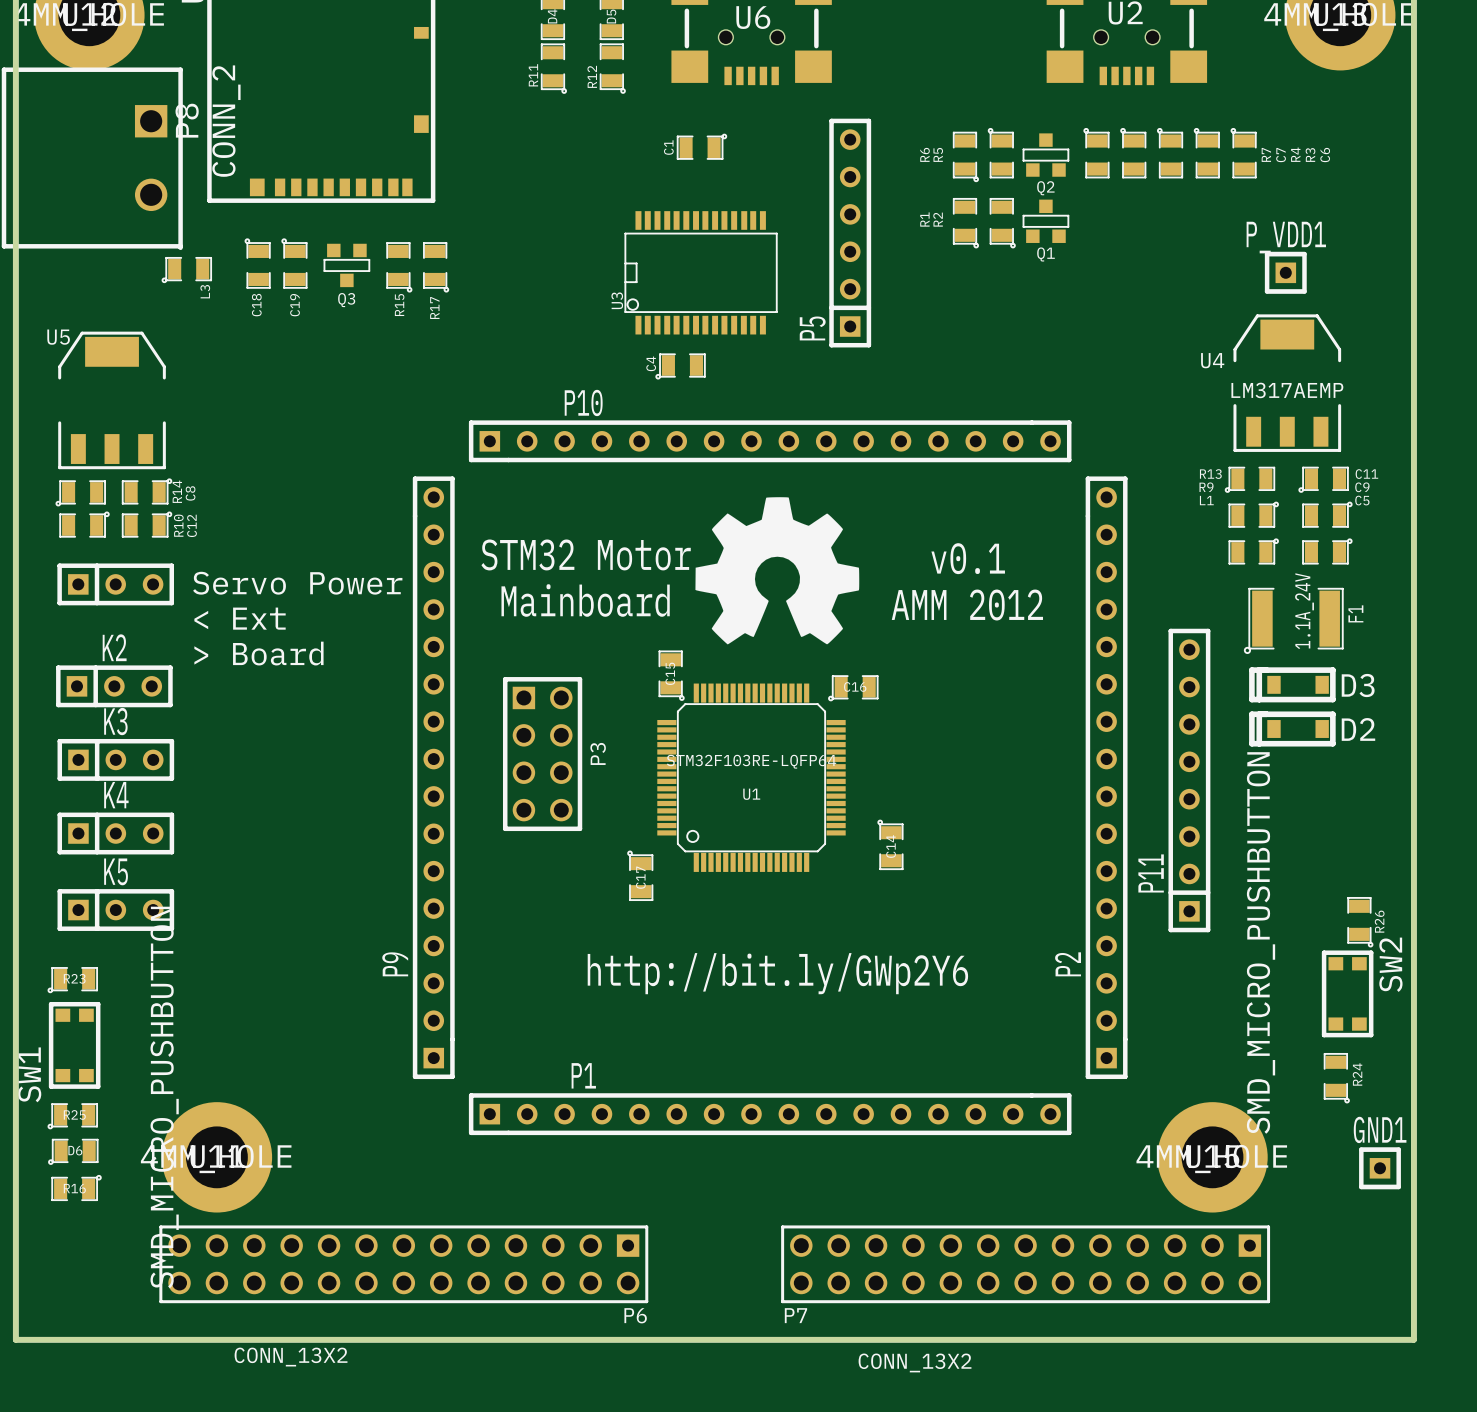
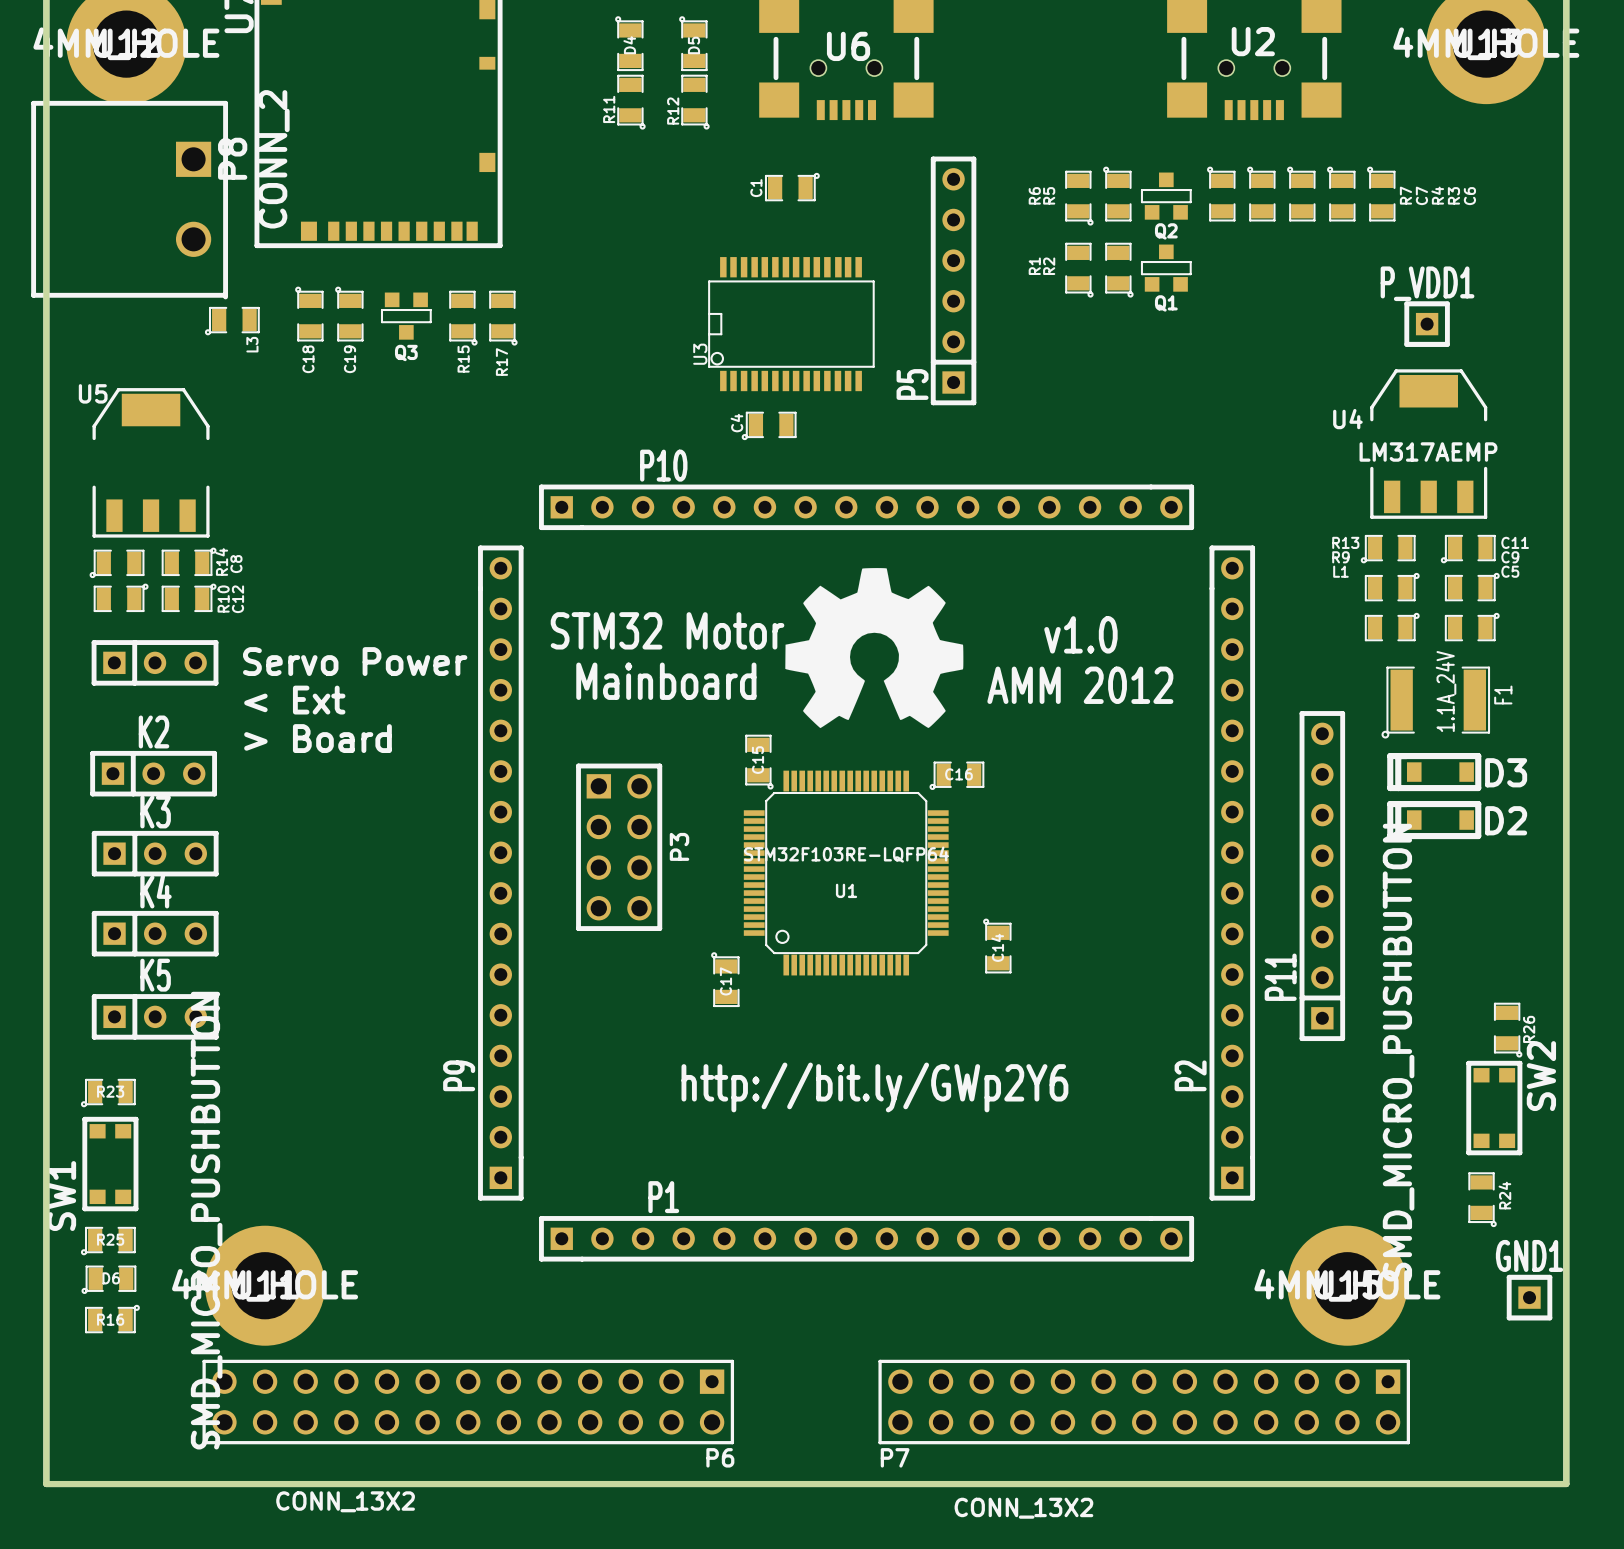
text: v0.1 (968, 558) -> v1.0 (1080, 634)

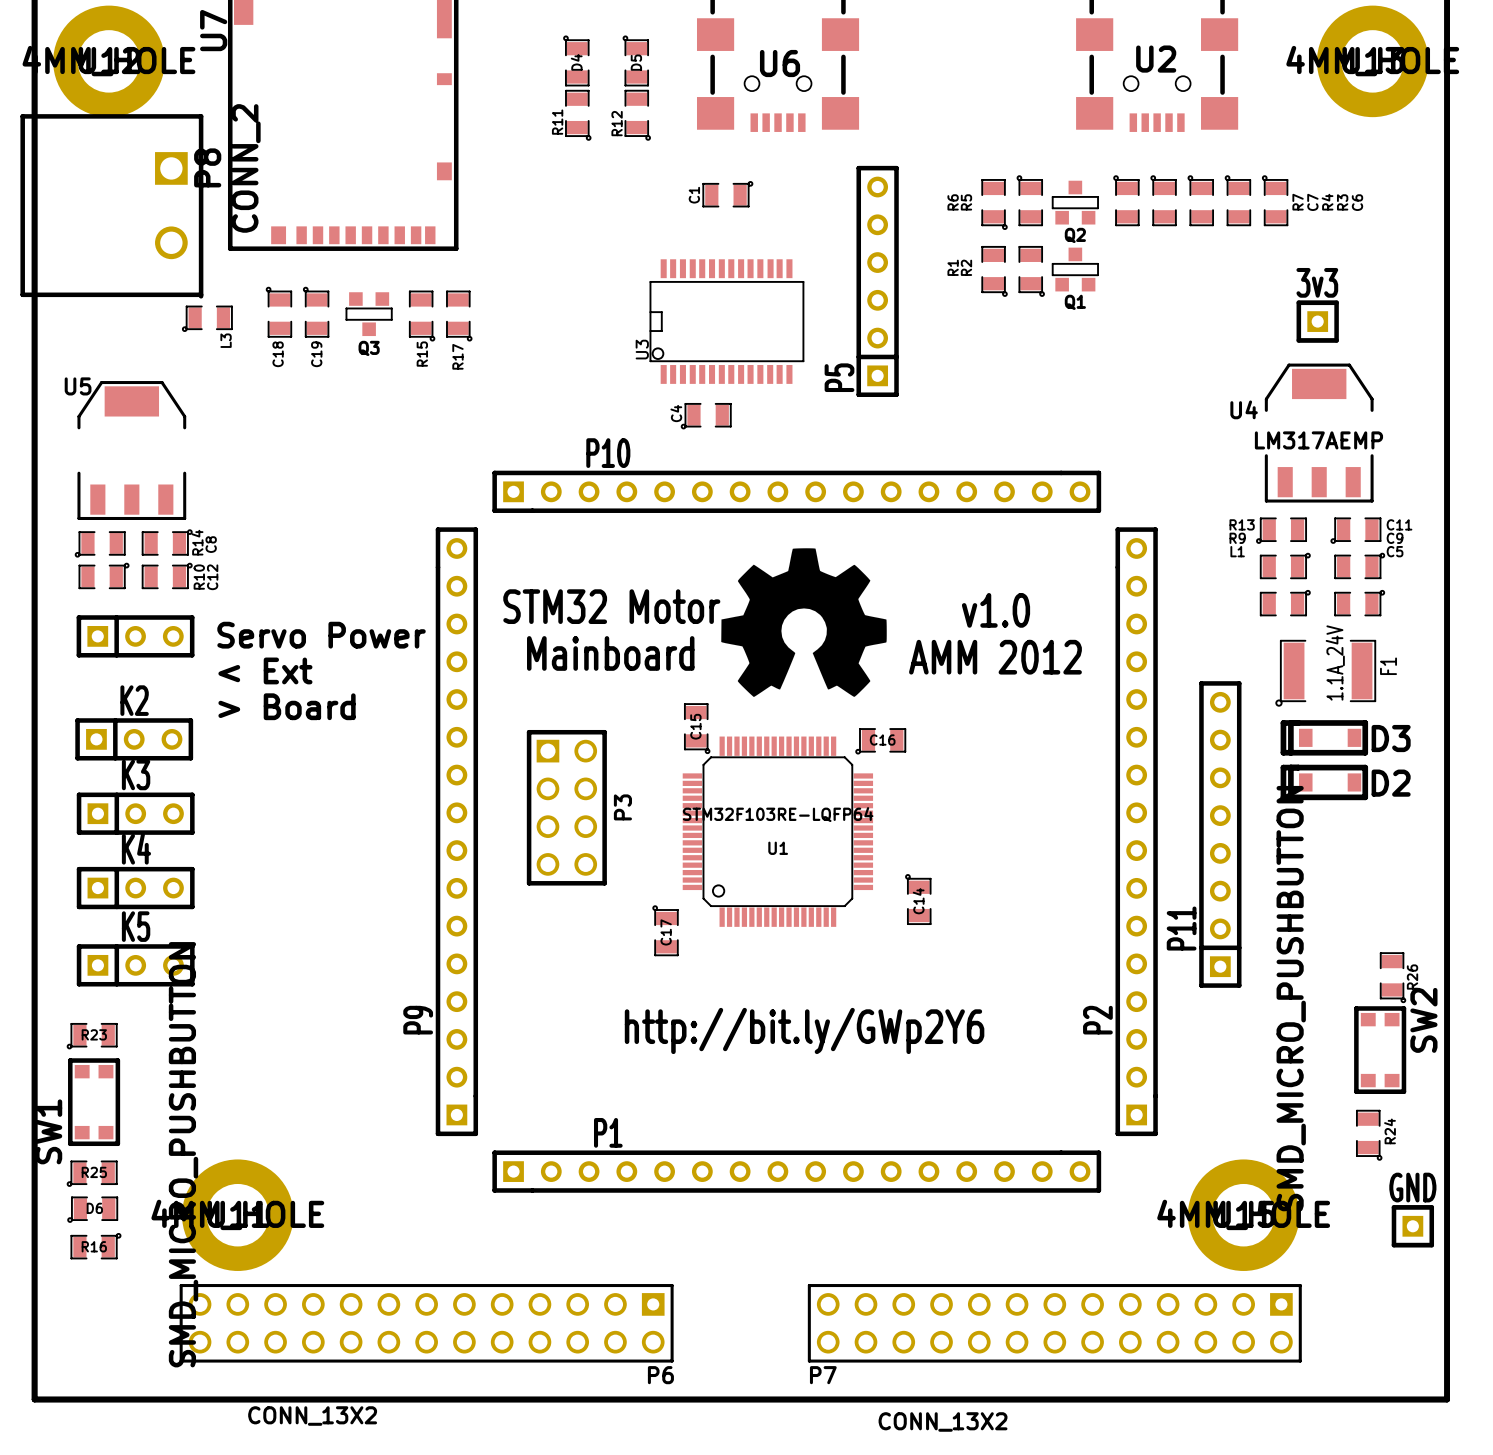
P_VDD1 name: P_VDD1 (1427, 283) -> 3v3 (1317, 282)
GND1 name: GND1 (1529, 1255) -> GND (1412, 1187)

